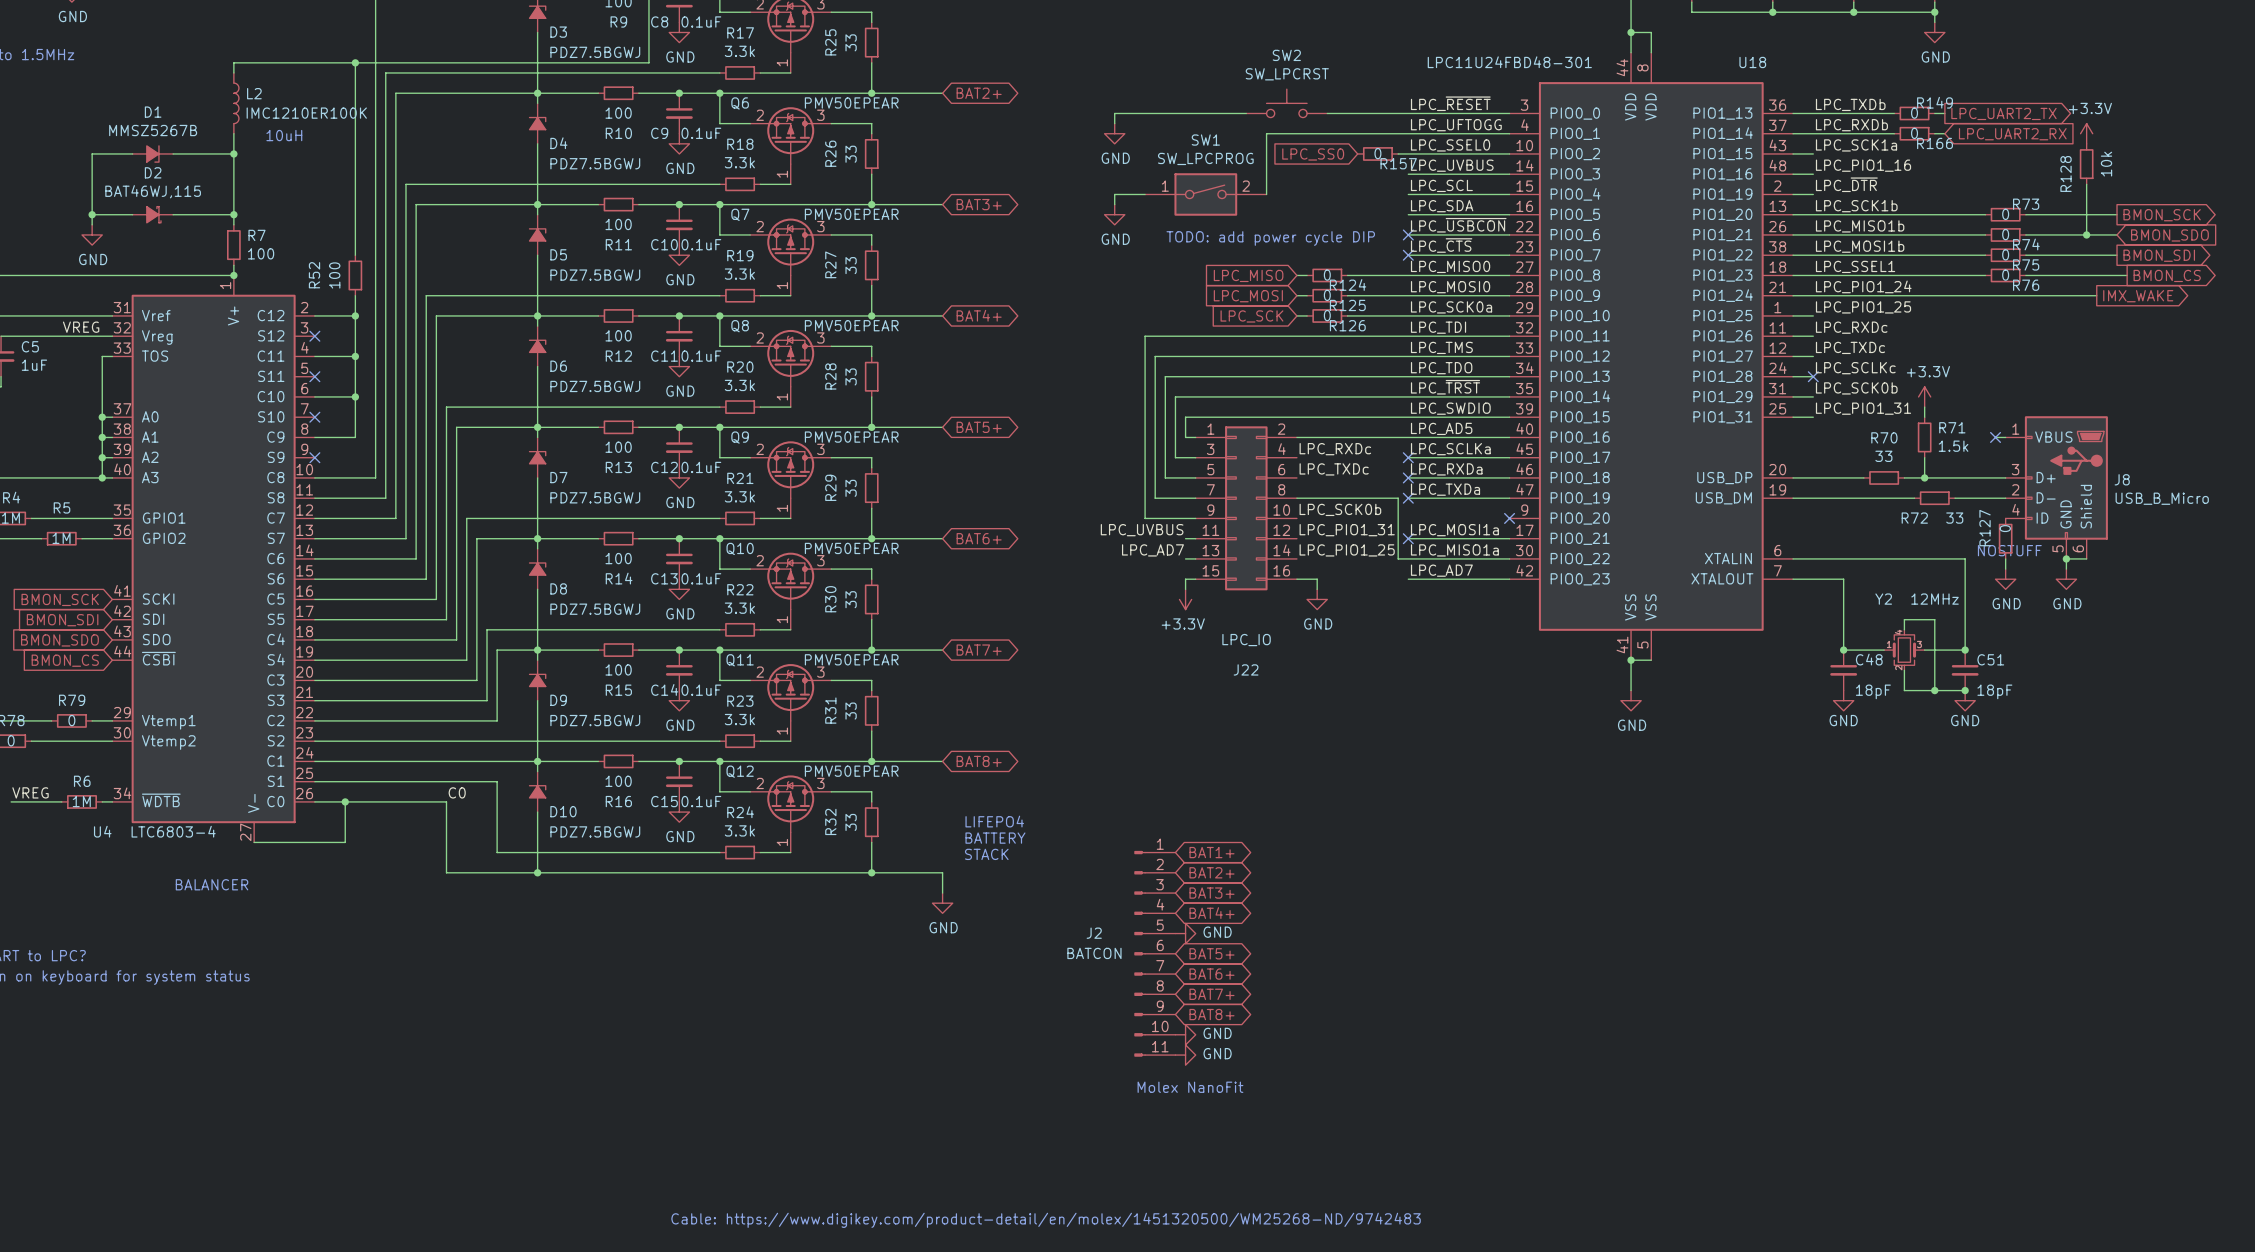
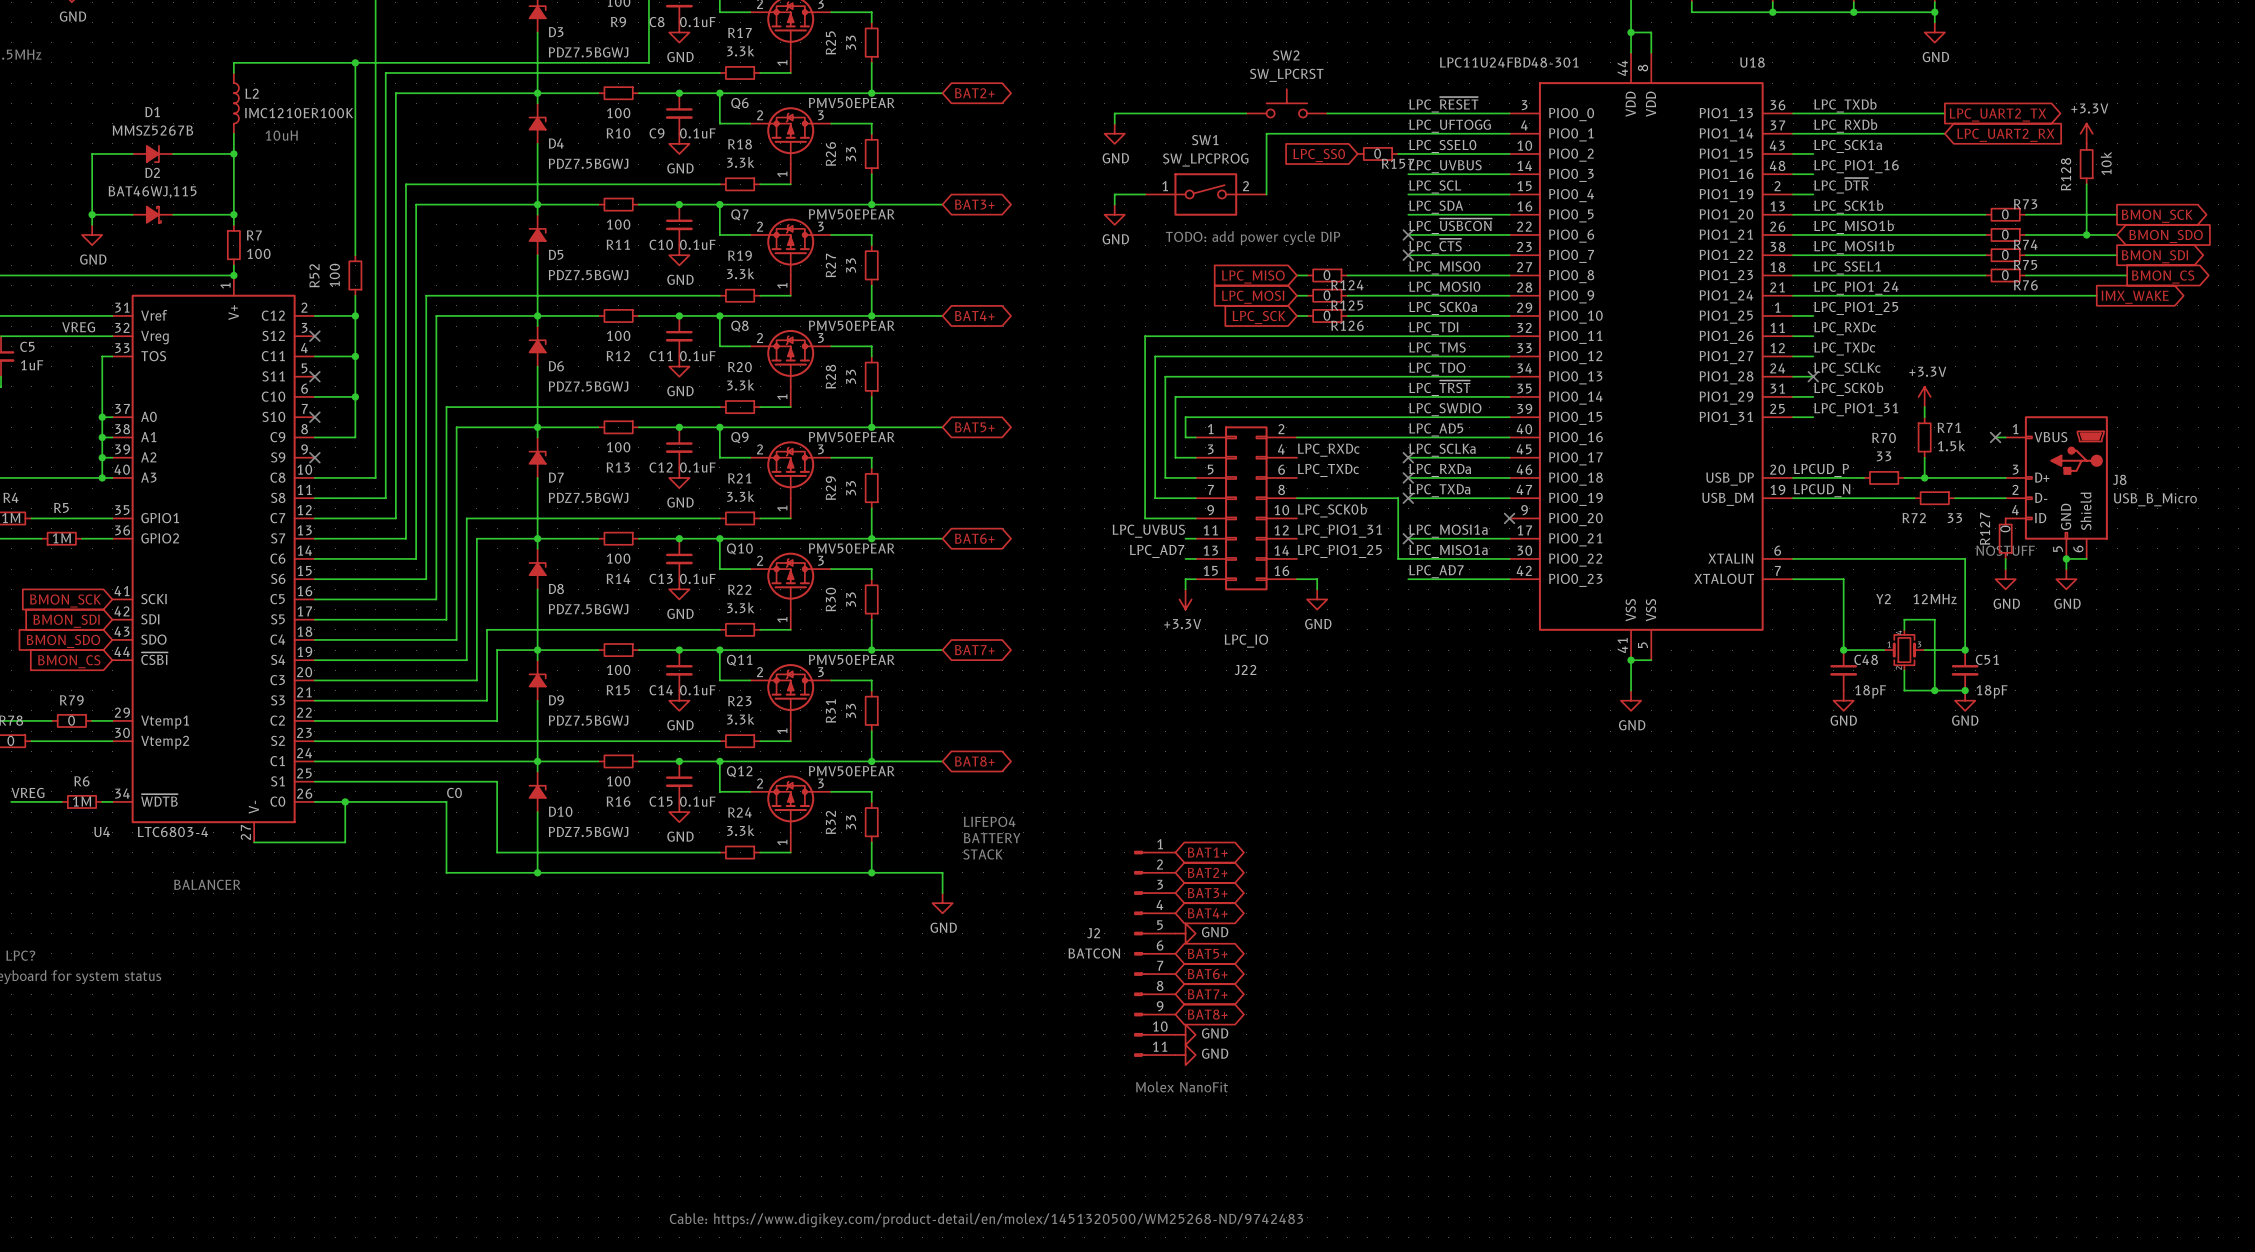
wire: none -> (1894, 113) (1934, 113)
R149: 0 (1914, 113) -> none
wire: none -> (1894, 133) (1934, 133)
R166: 0 (1914, 133) -> none
label: none -> LPCUD_P (1821, 470)
label: none -> LPCUD_N (1822, 490)

